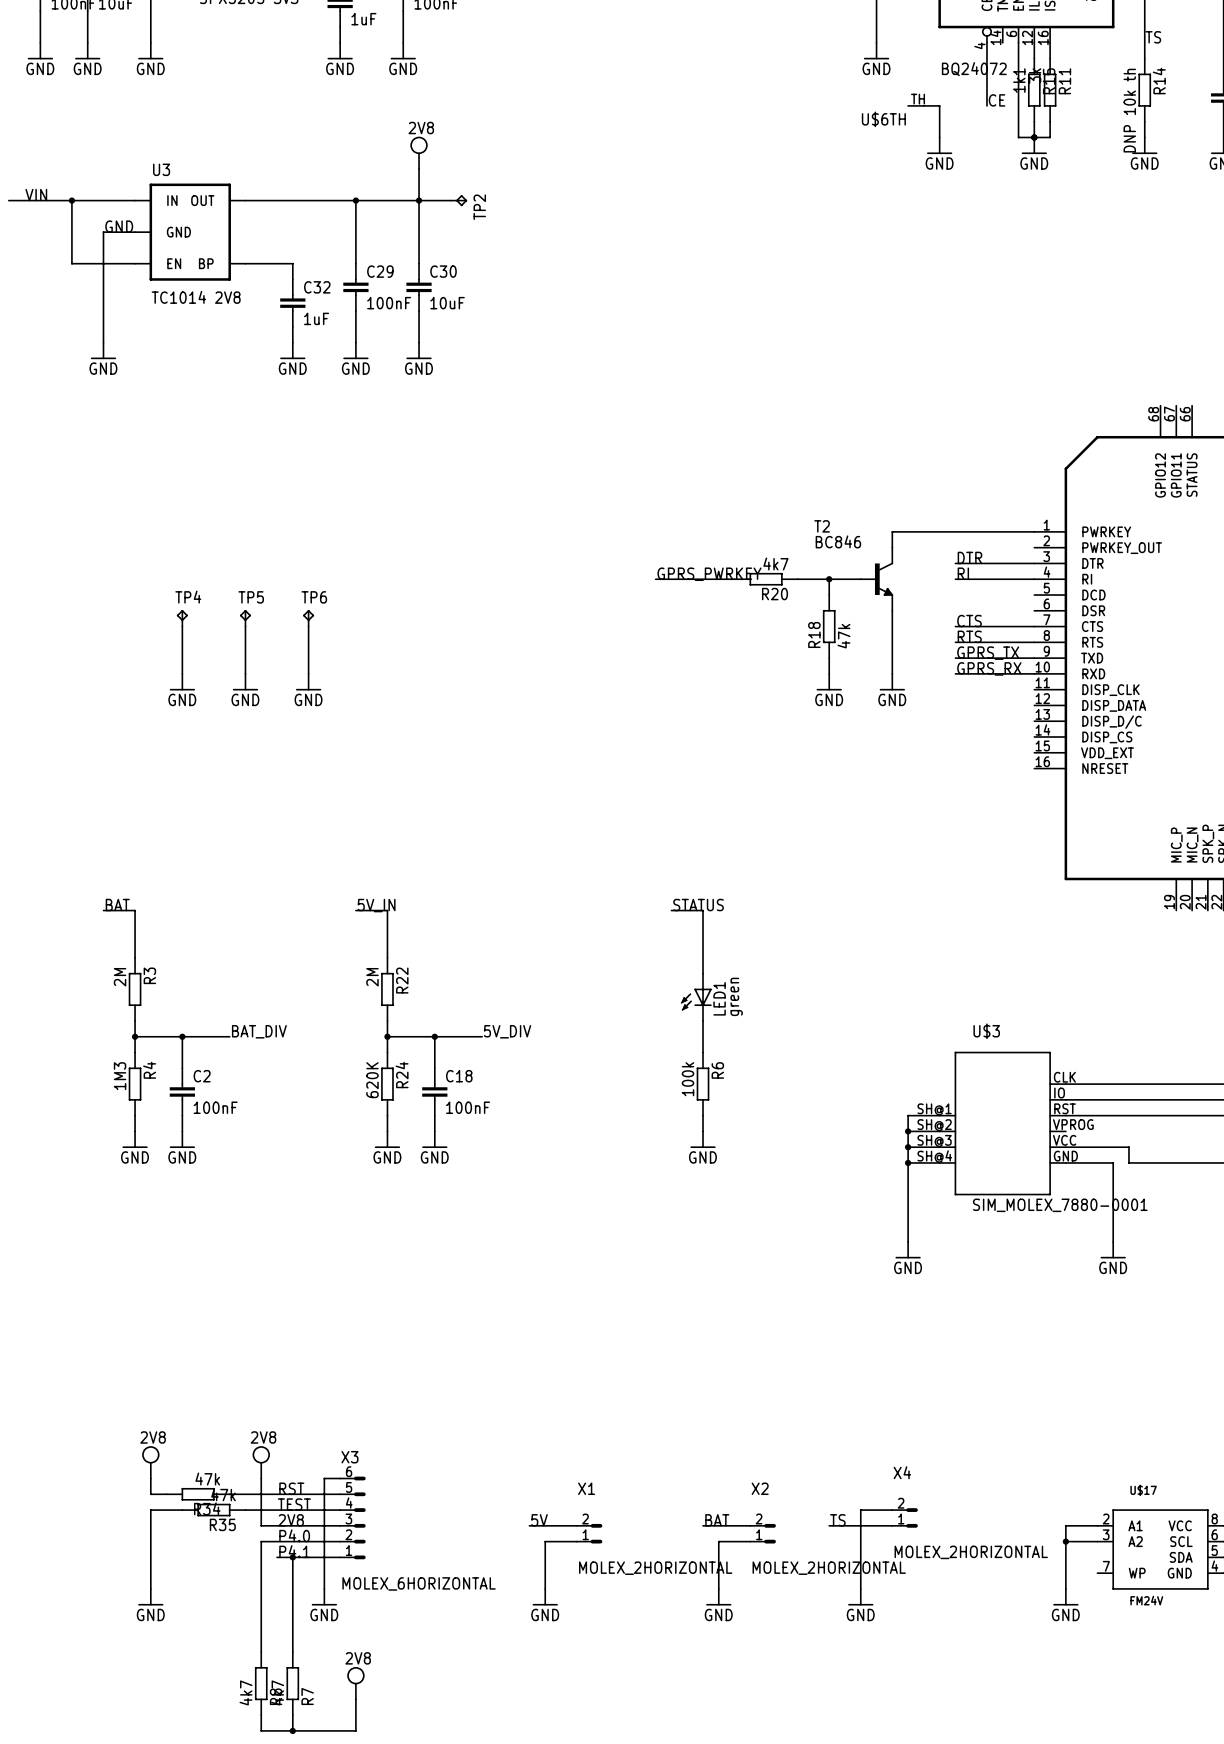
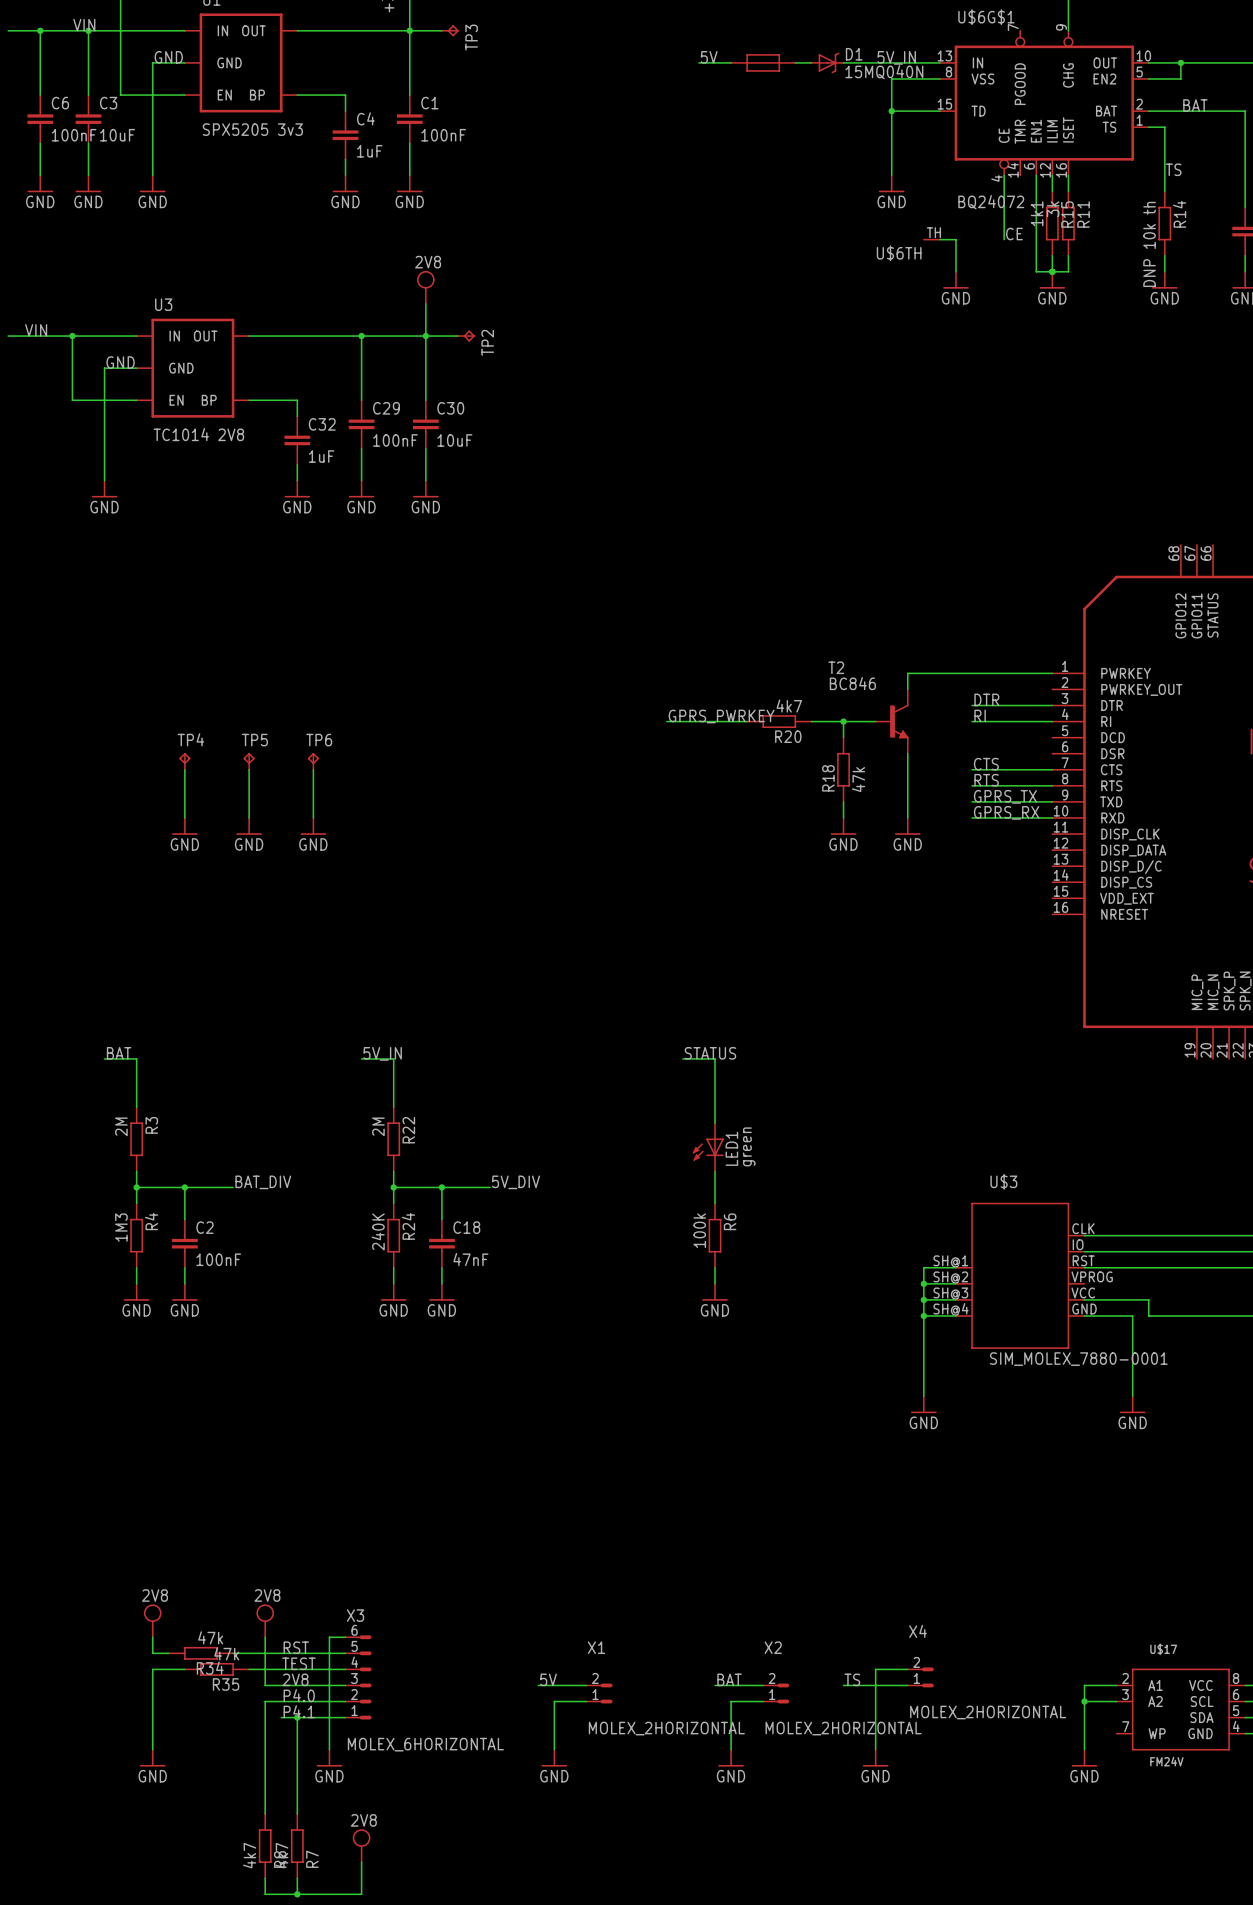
R24 value: 620K (372, 1080) -> 240K (378, 1231)
C18 value: 100nF (468, 1107) -> 47nF (470, 1259)

